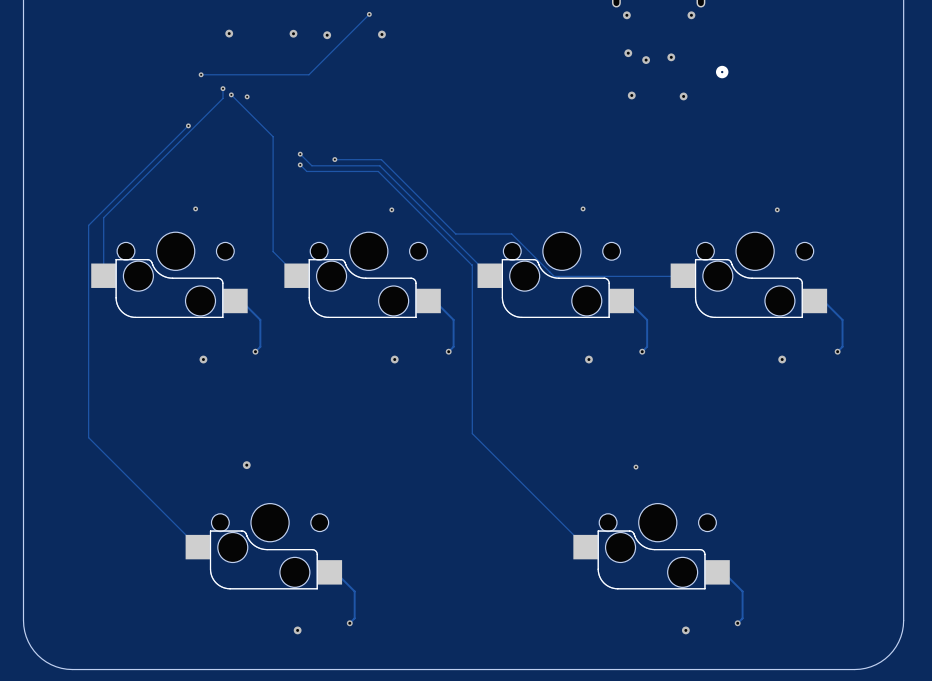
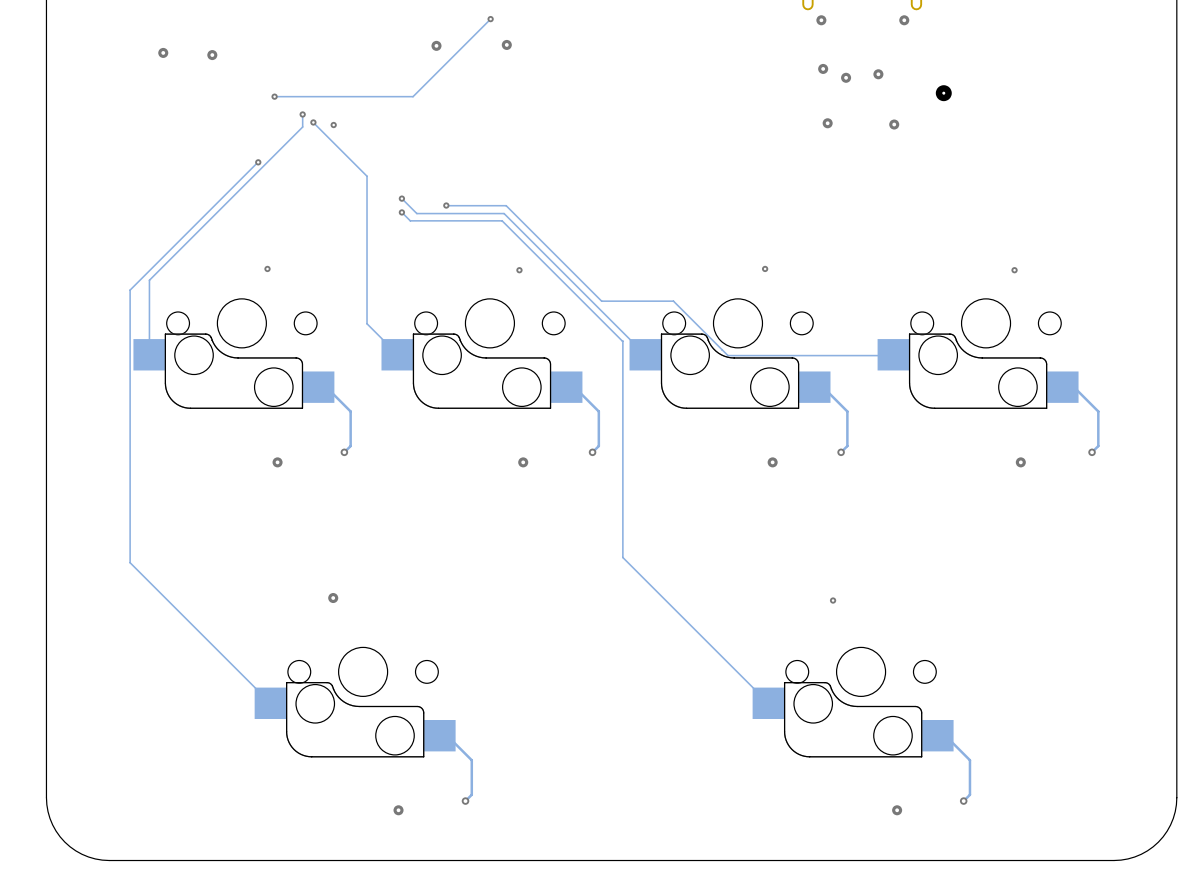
via: (229, 33) -> none
via: (293, 33) -> none
via: none -> (163, 52)
via: none -> (212, 55)

